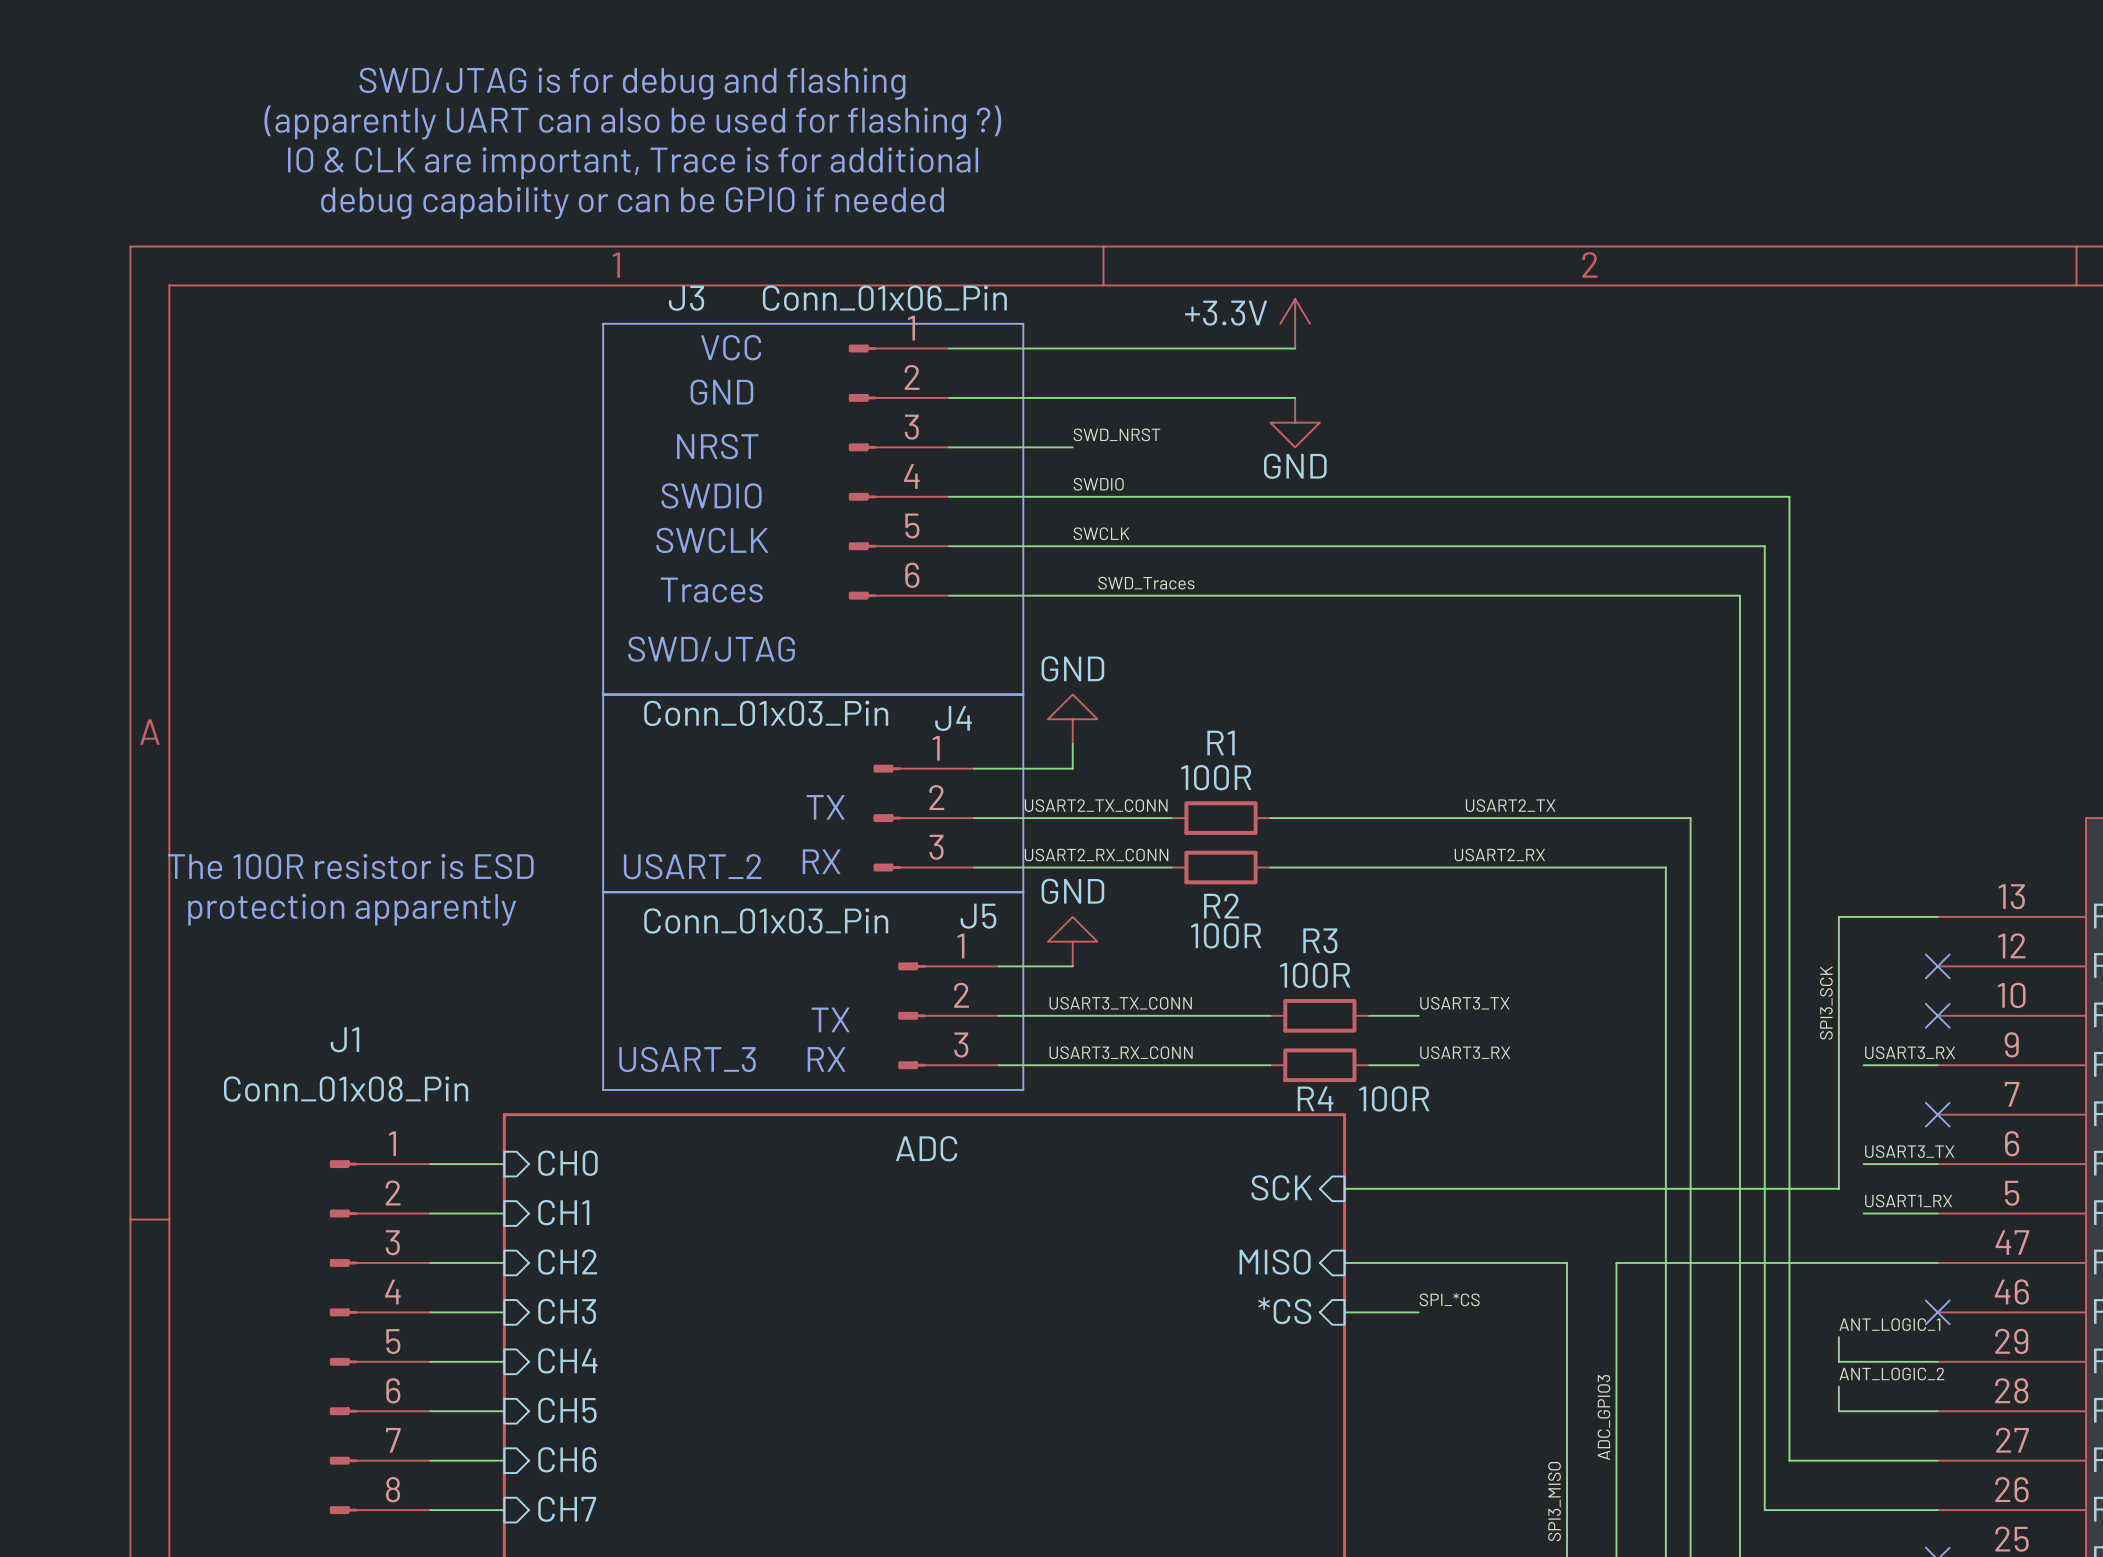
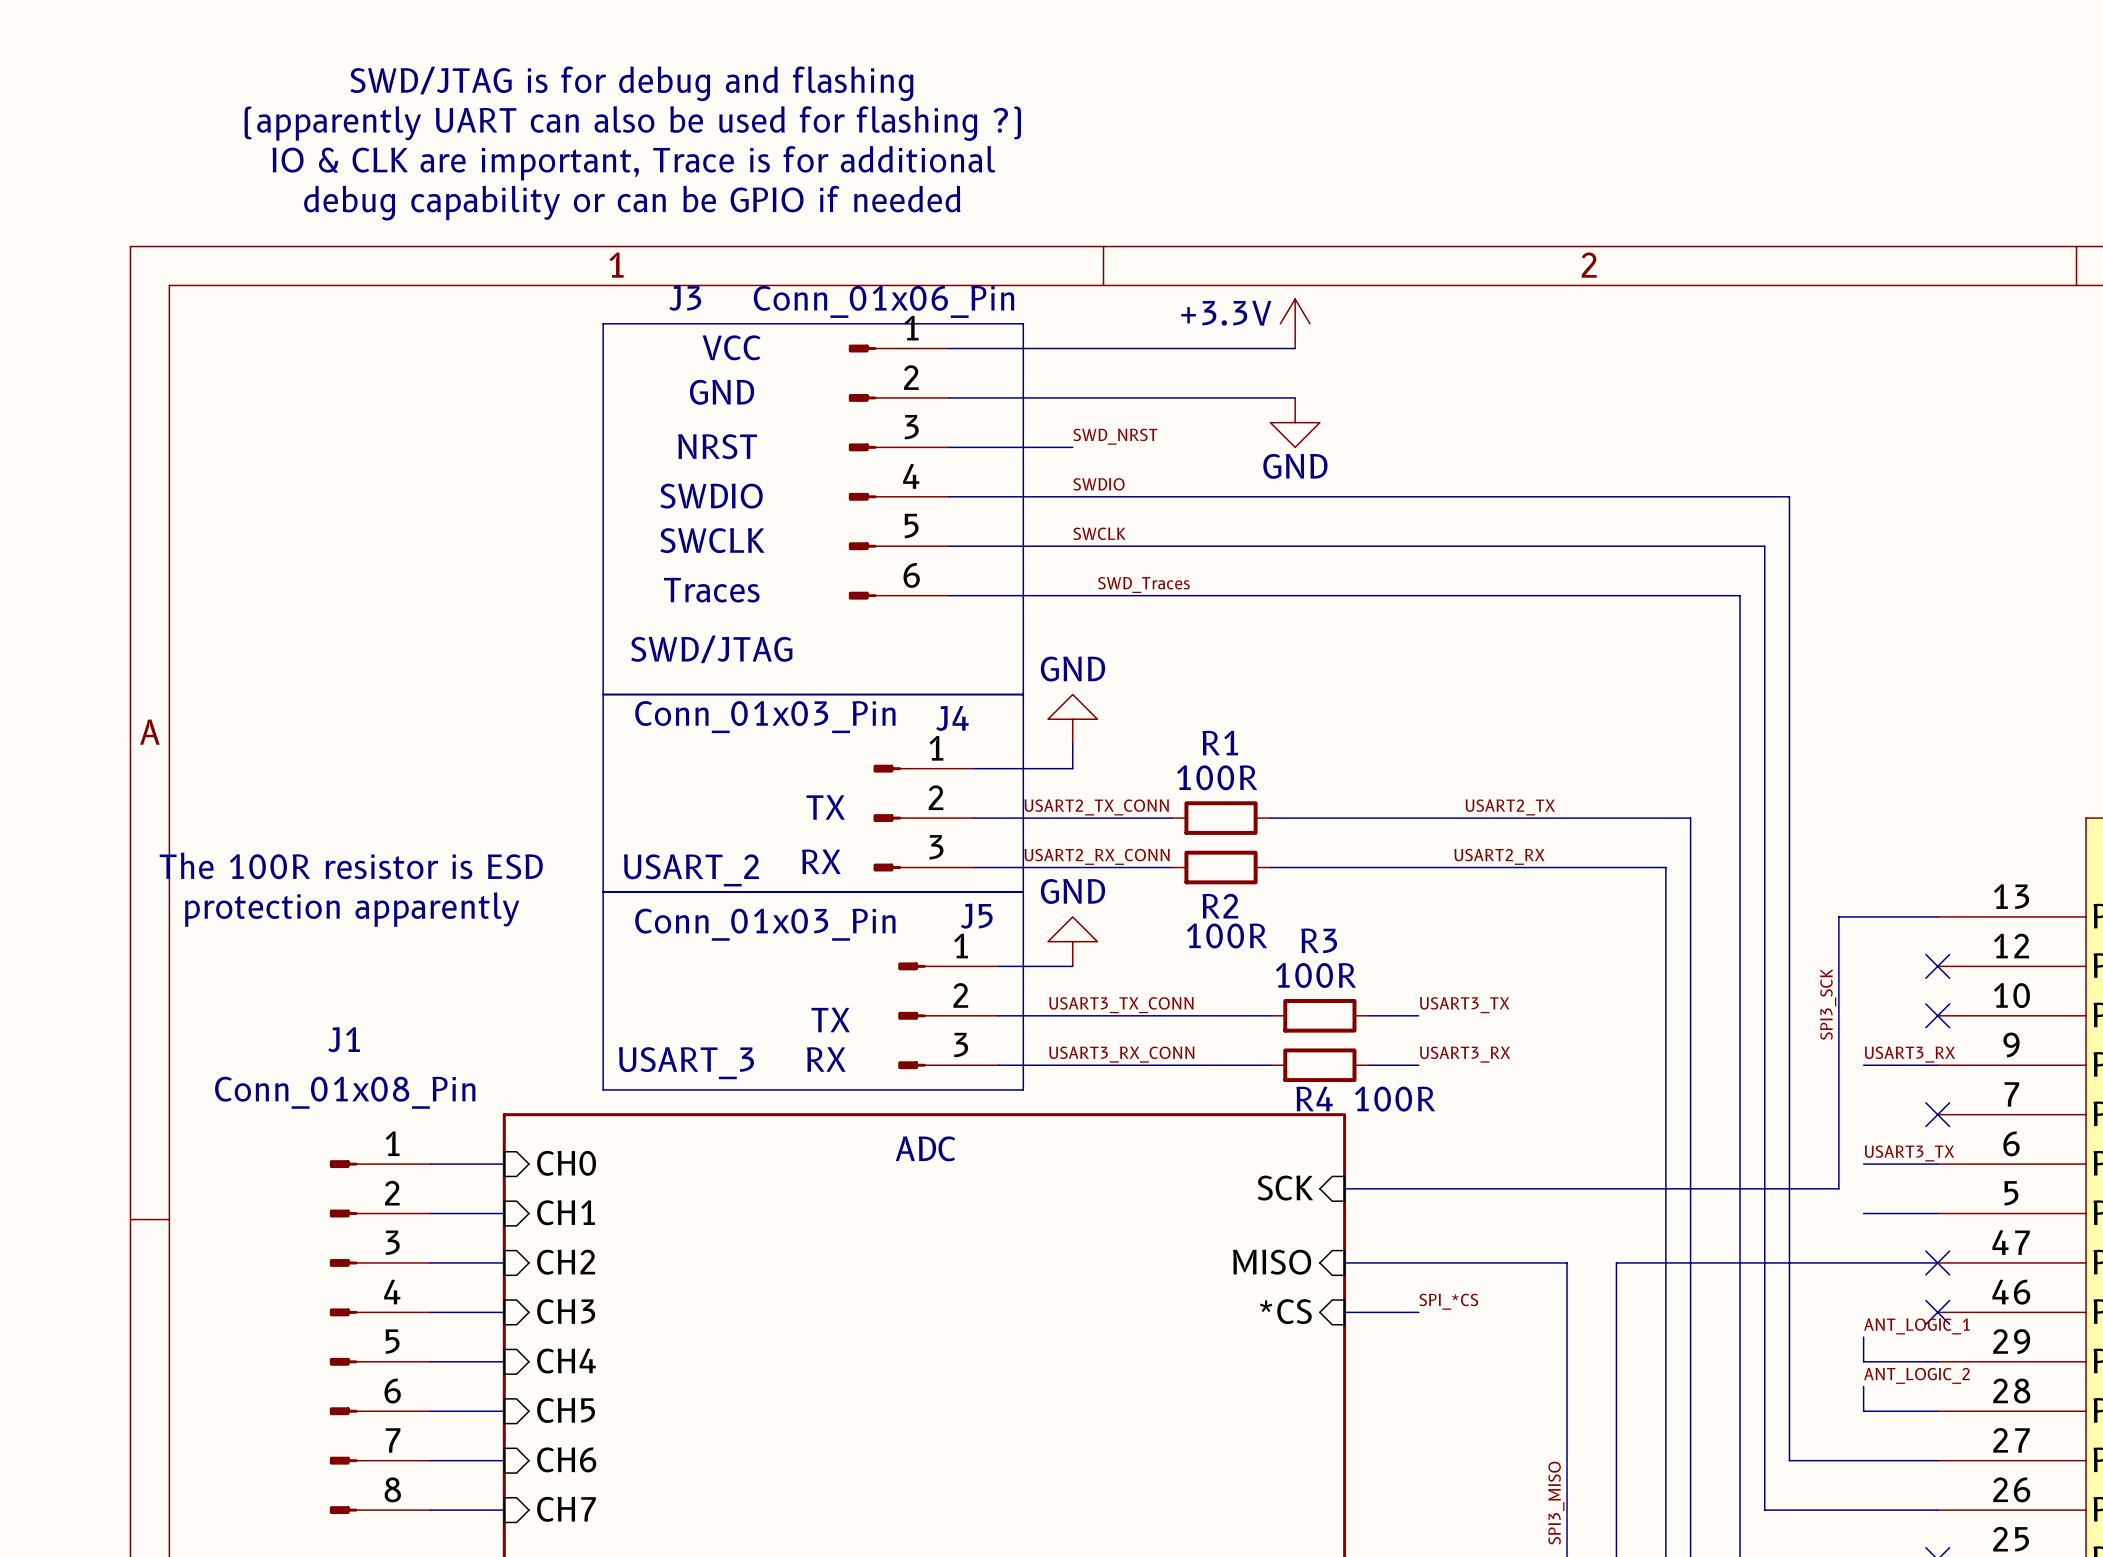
label: USART1_RX (1908, 1201) -> none
no-connect mark: none -> (1937, 1262)
label position: ANT_LOGIC_1 (1889, 1324) -> ANT_LOGIC_1 (1916, 1326)
wire: (1838, 1337) (1838, 1361) (1863, 1361) -> (1863, 1337) (1863, 1361)
label position: ANT_LOGIC_2 (1891, 1374) -> ANT_LOGIC_2 (1916, 1375)
wire: (1838, 1386) (1838, 1411) (1863, 1411) -> (1863, 1386) (1863, 1411)
label: ADC_GPIO3 (1603, 1417) -> none

